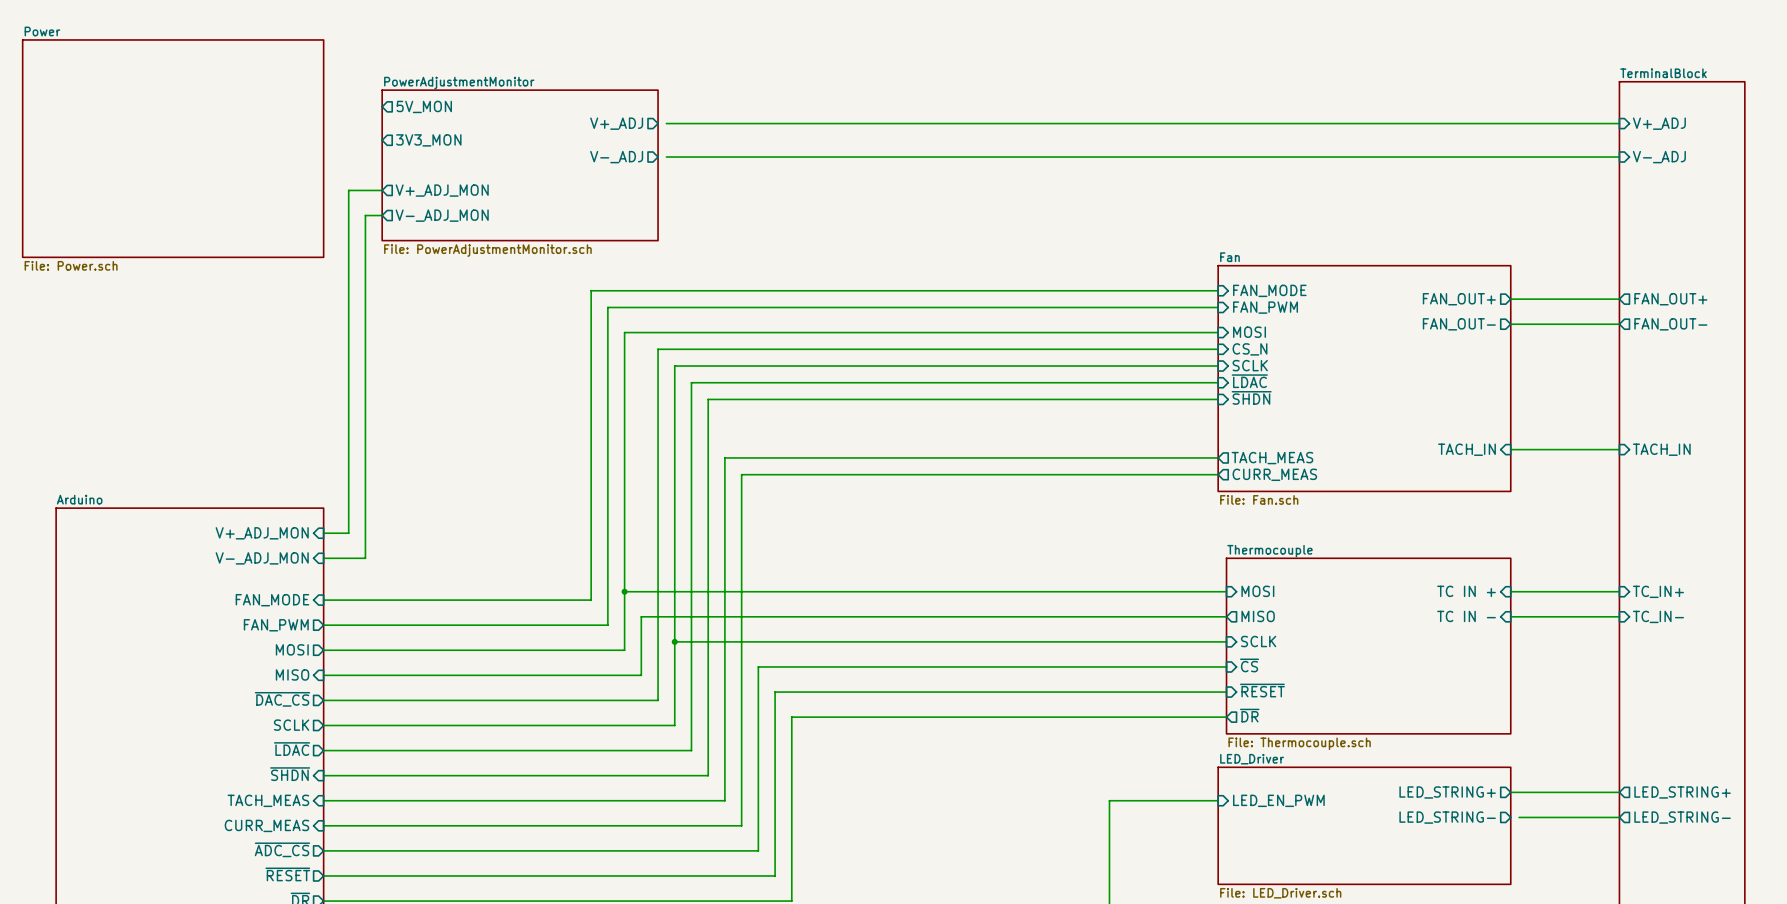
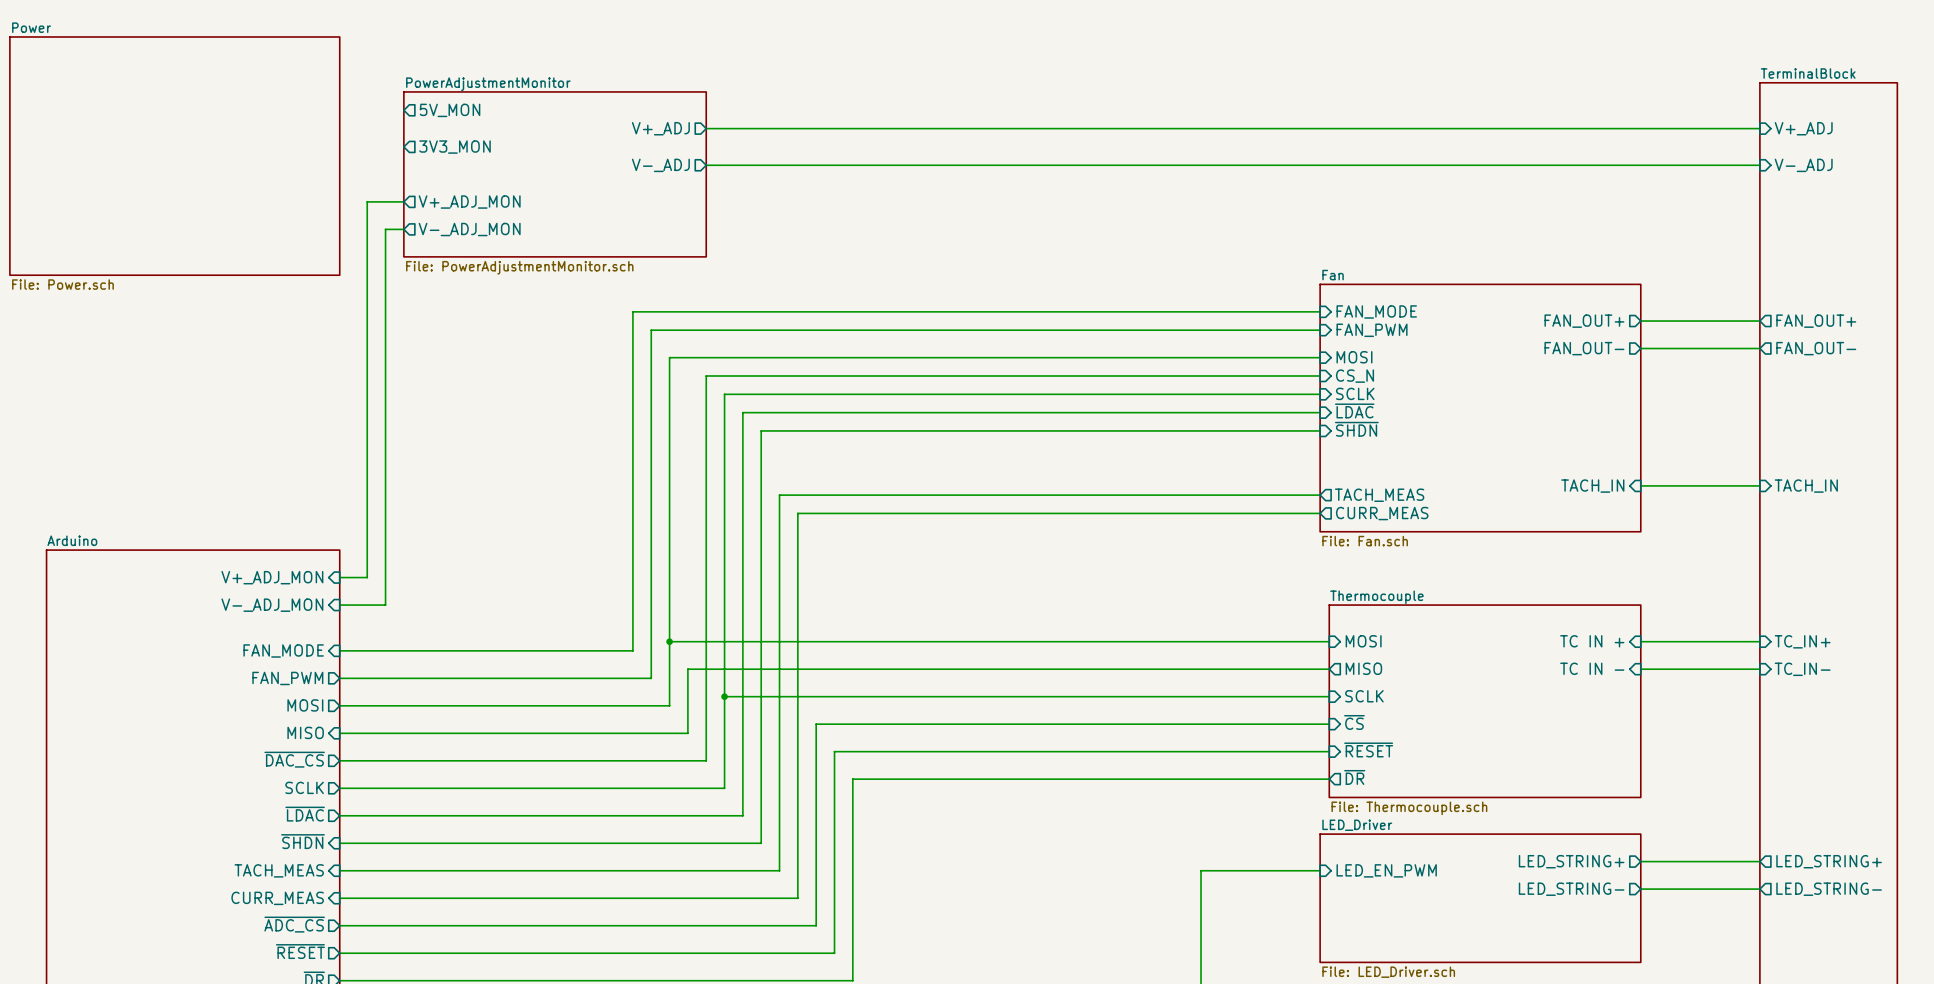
wire: none -> (706, 128) (715, 128)
wire: none -> (706, 165) (715, 165)
wire: none -> (1640, 889) (1649, 889)

